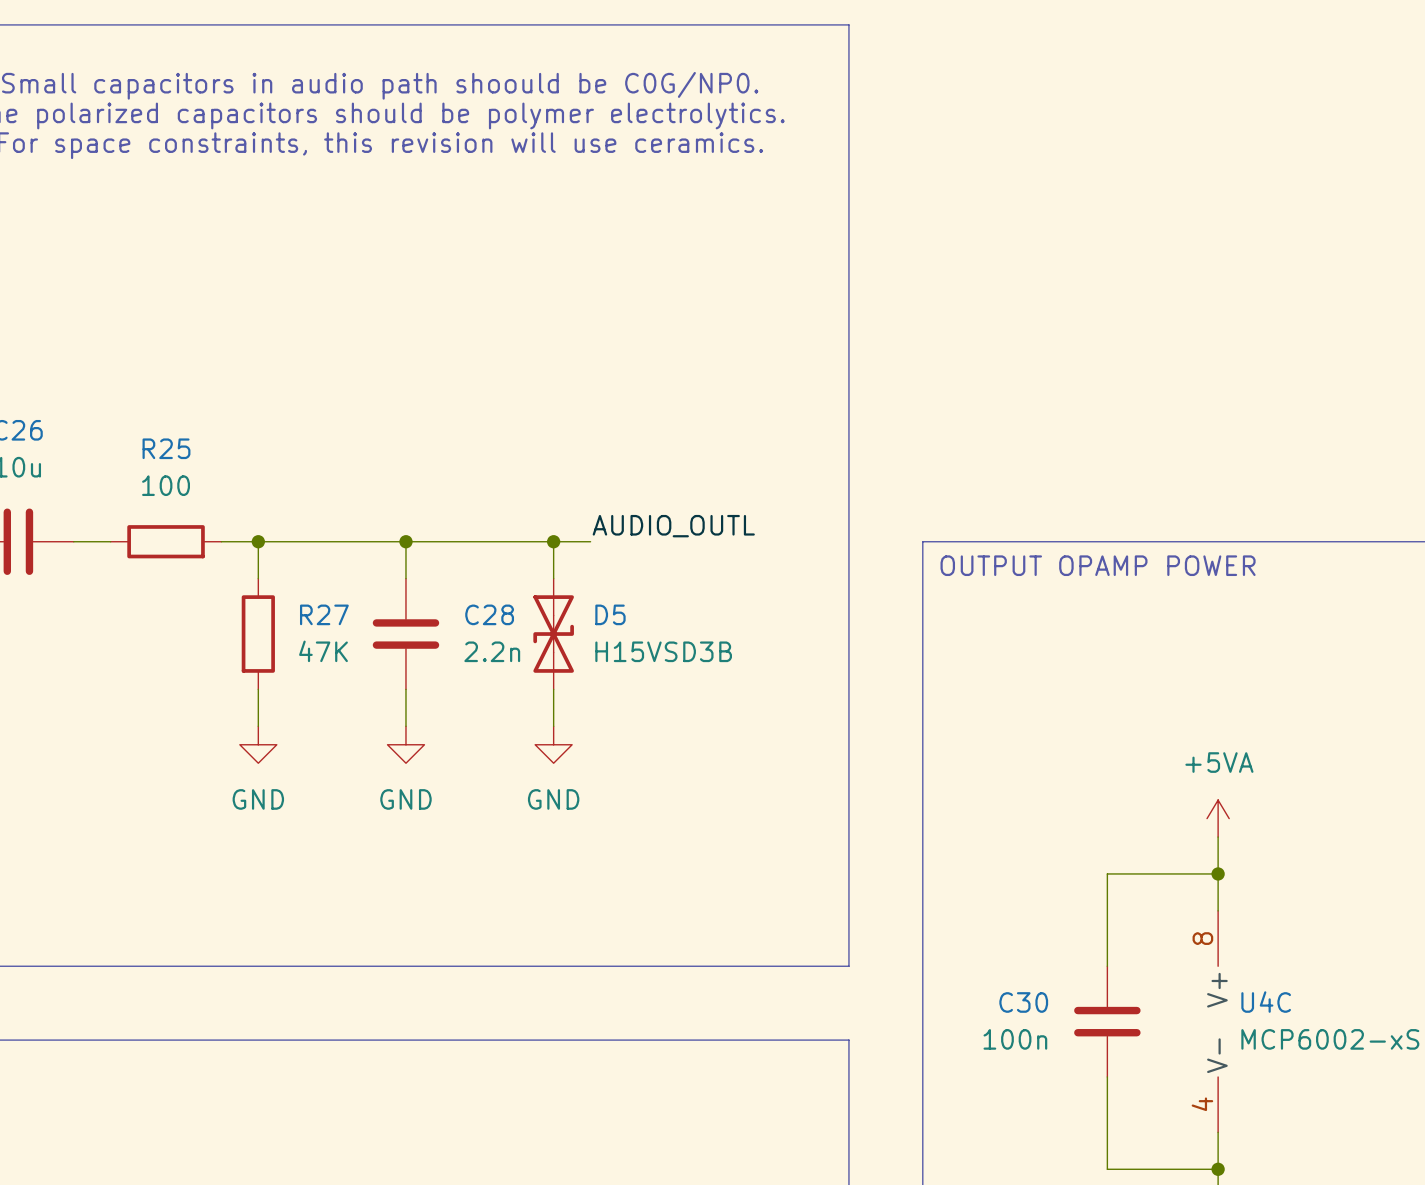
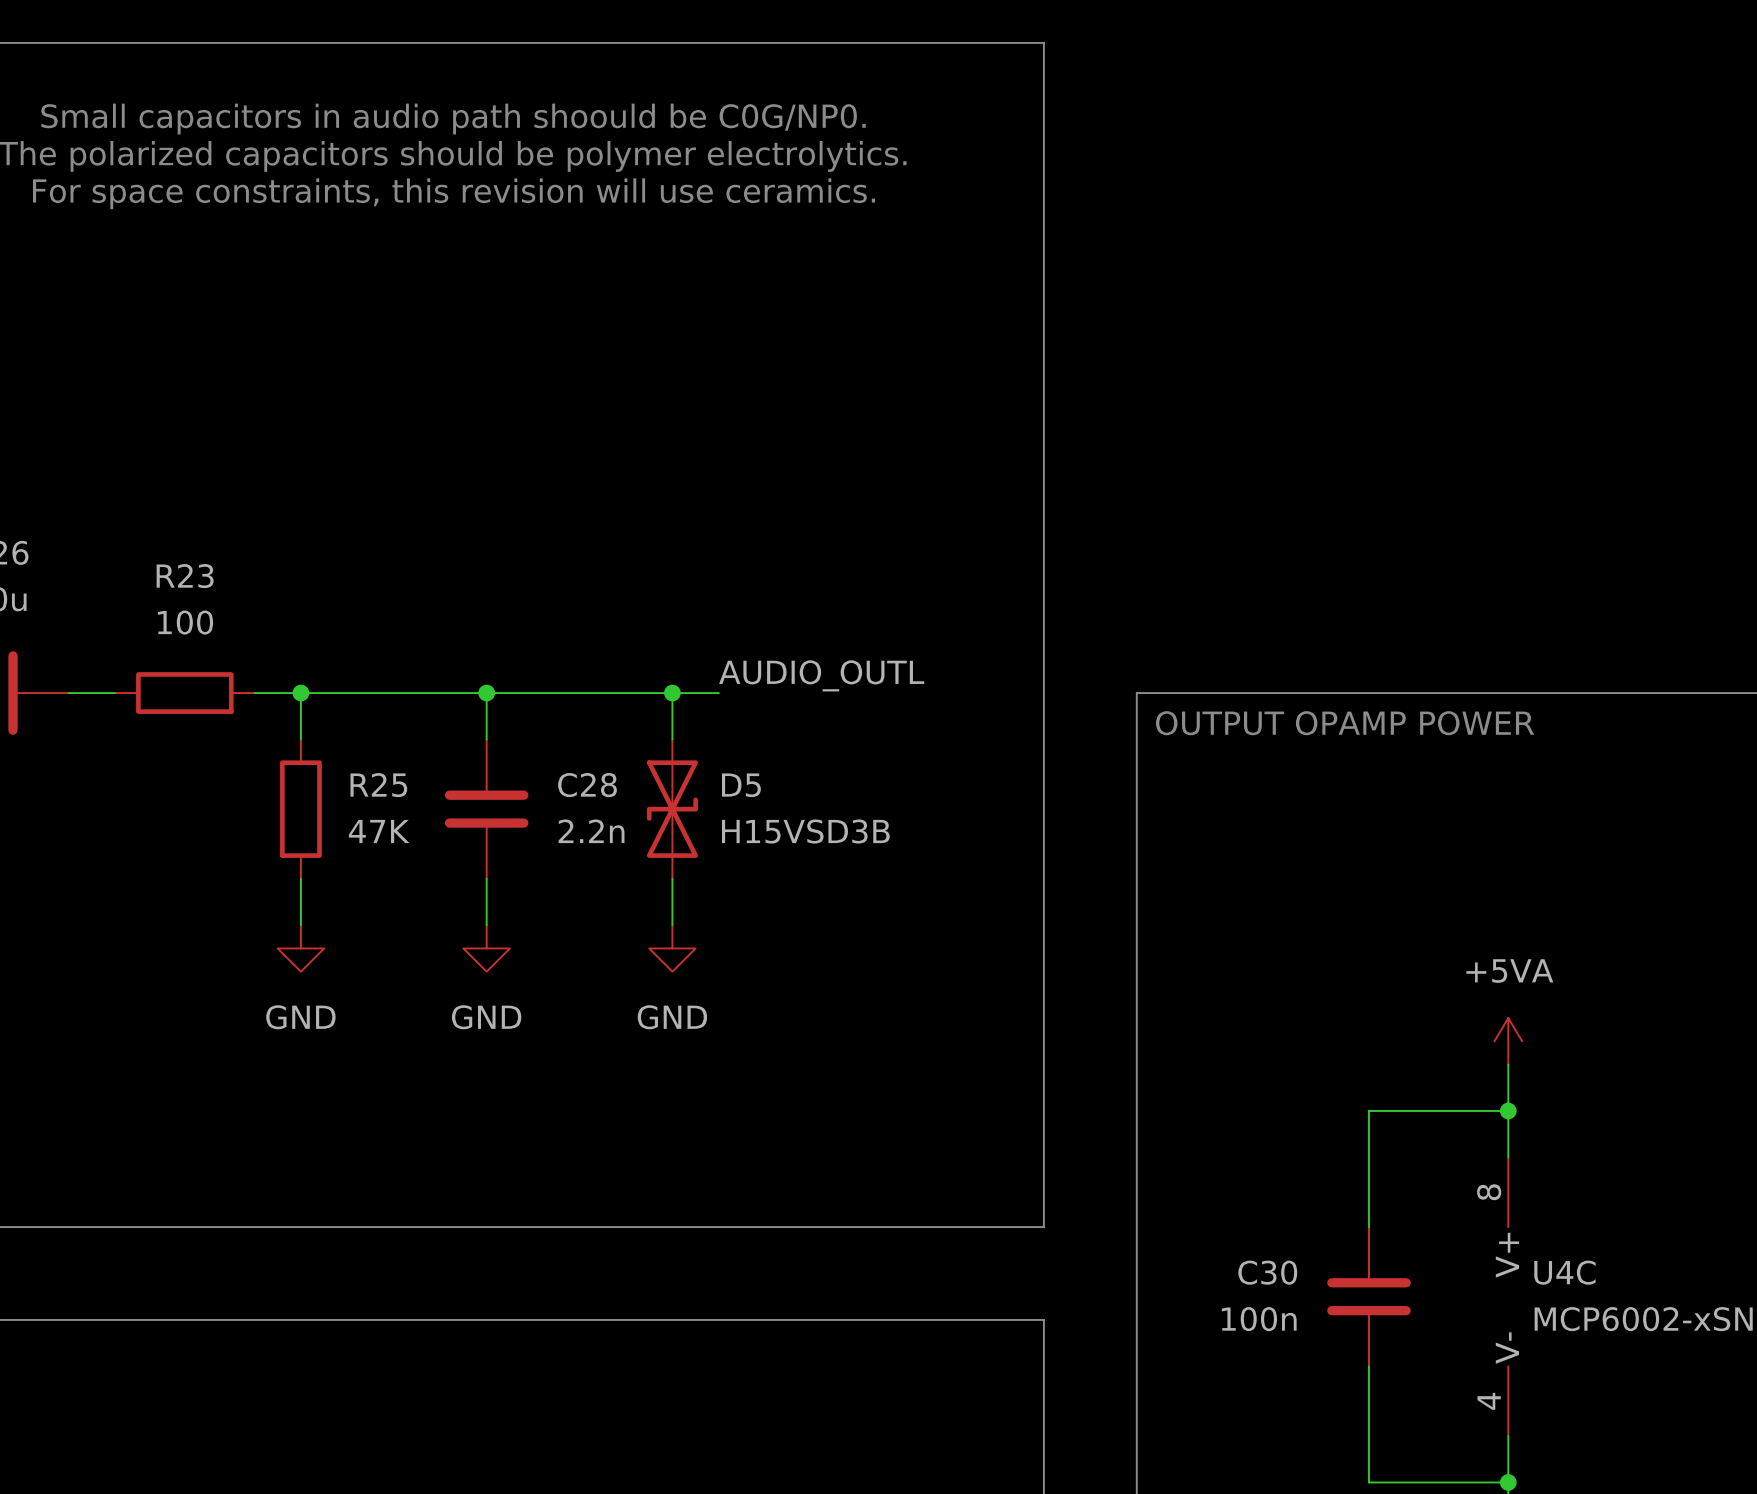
R25 name: R25 (166, 448) -> R23 (185, 576)
R27 name: R27 (324, 614) -> R25 (378, 785)

